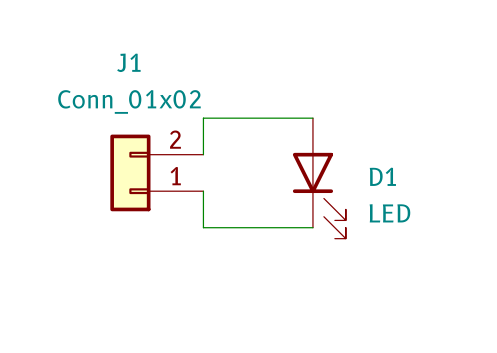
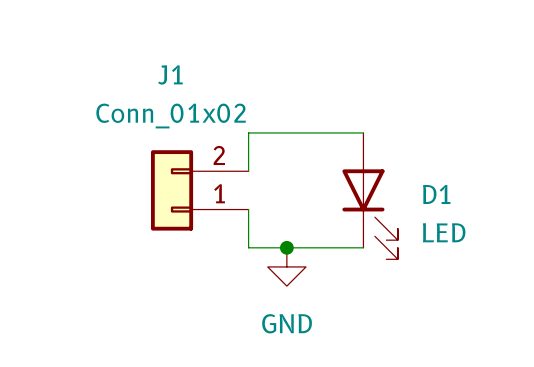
junction: none -> (286, 247)
power symbol: none -> GND (286, 266)

